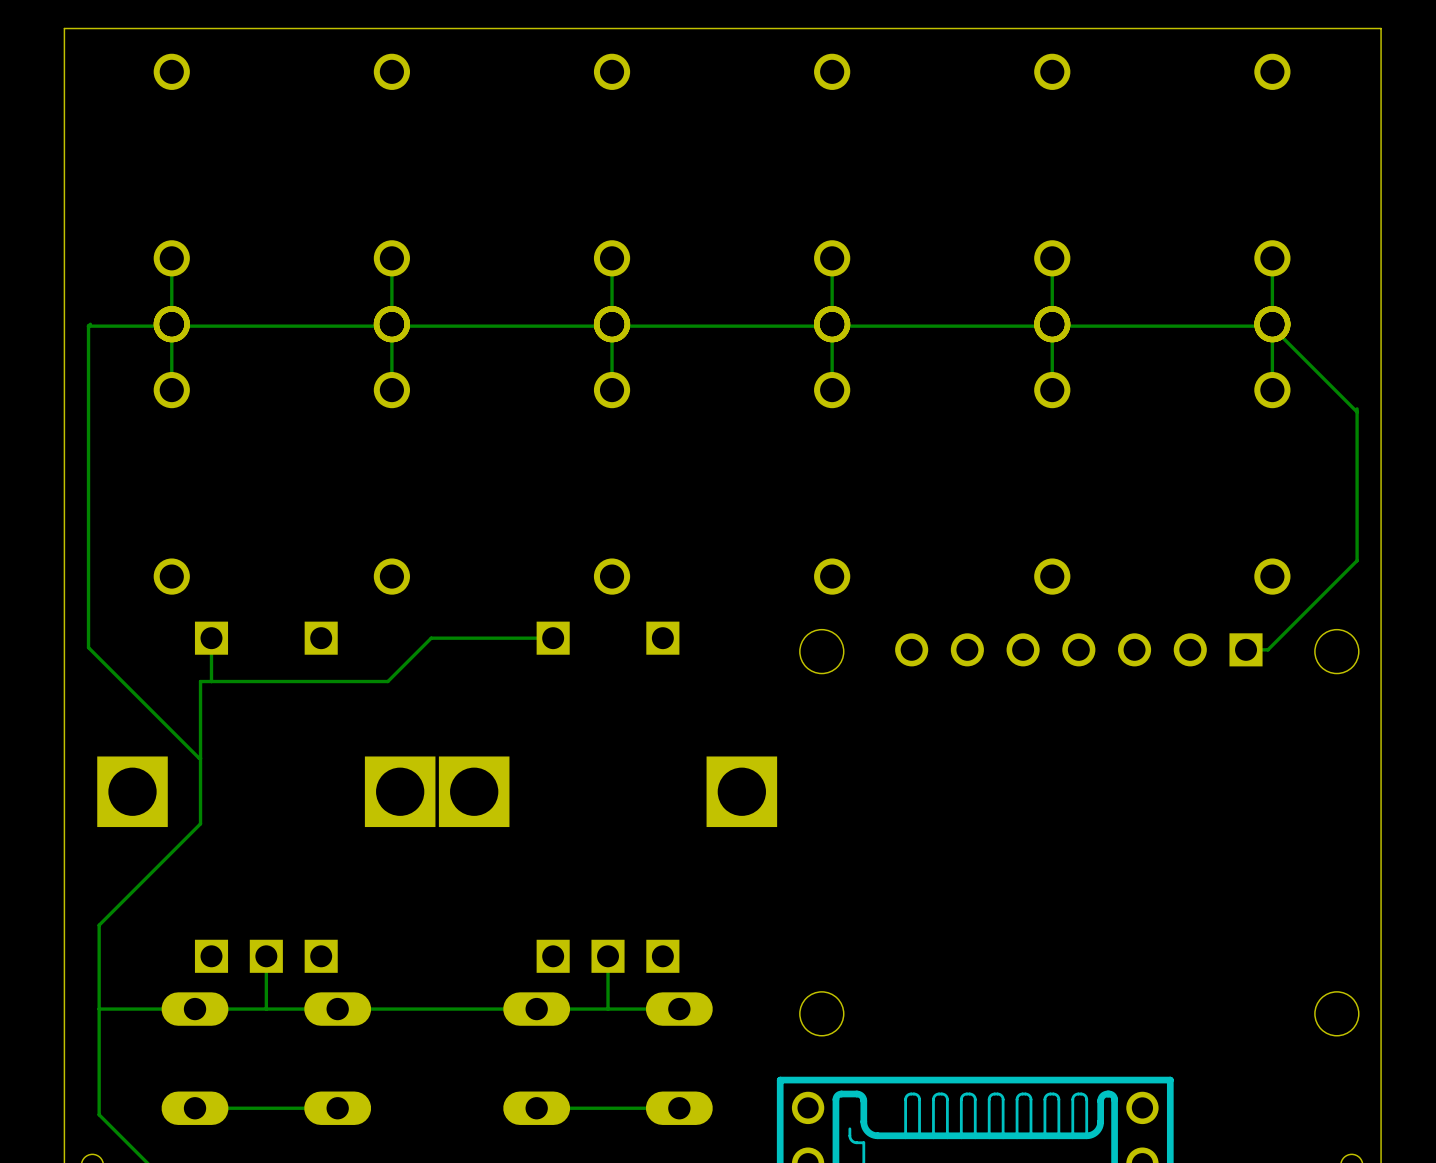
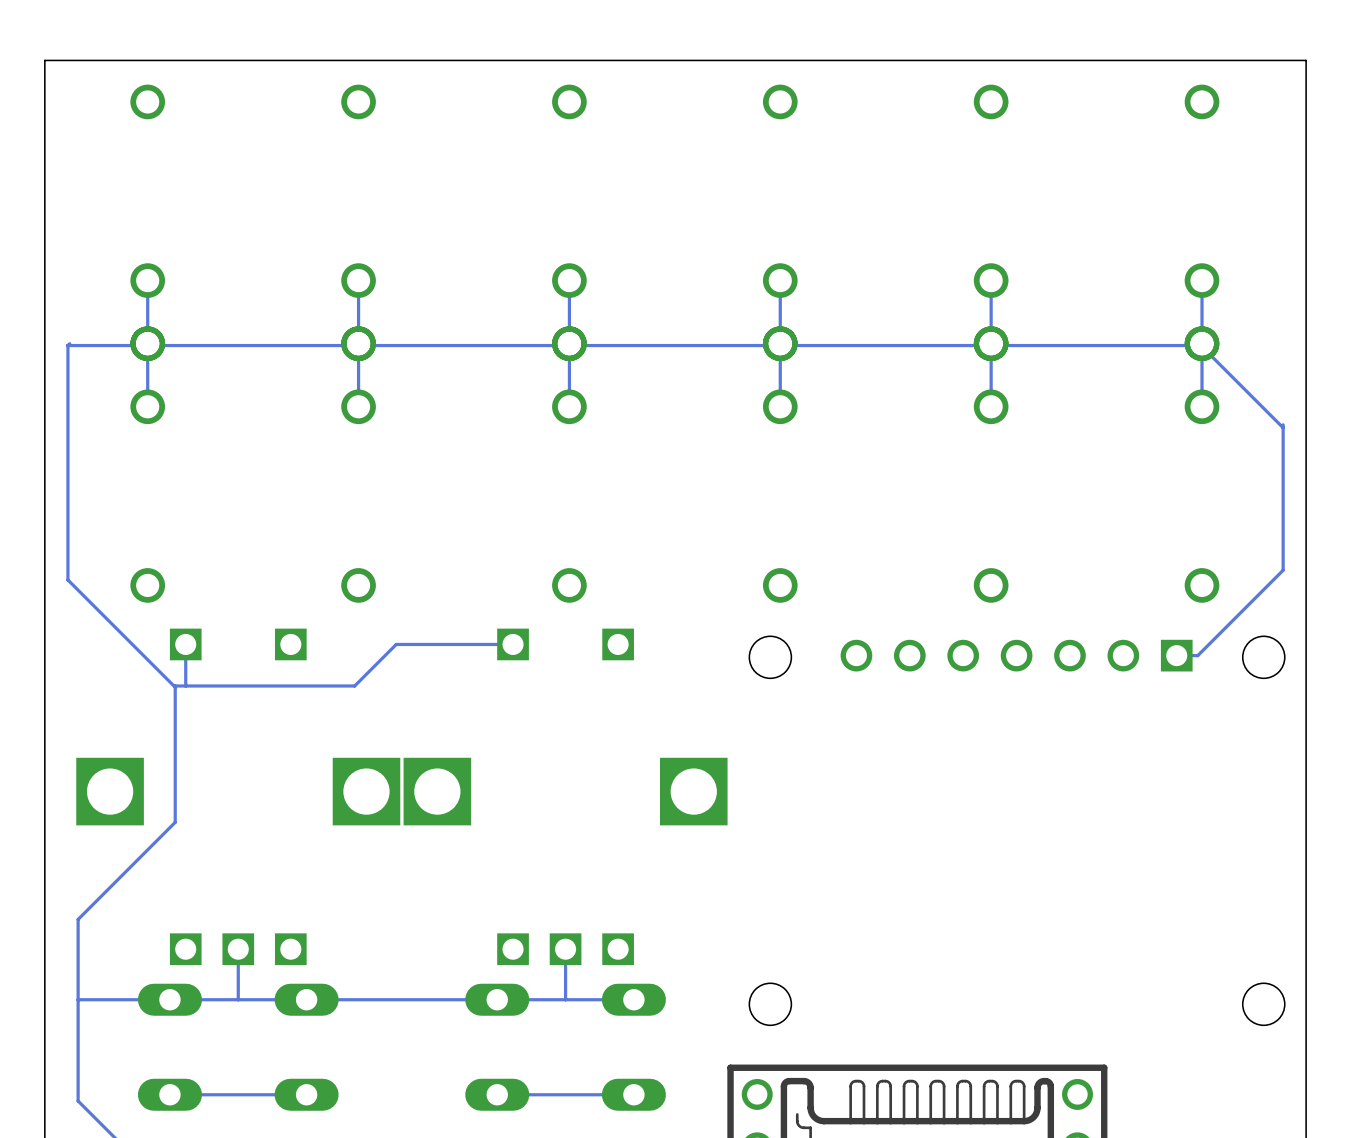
bottom track: (88, 570) (88, 647) (200, 758) -> (67, 579) (175, 687)

